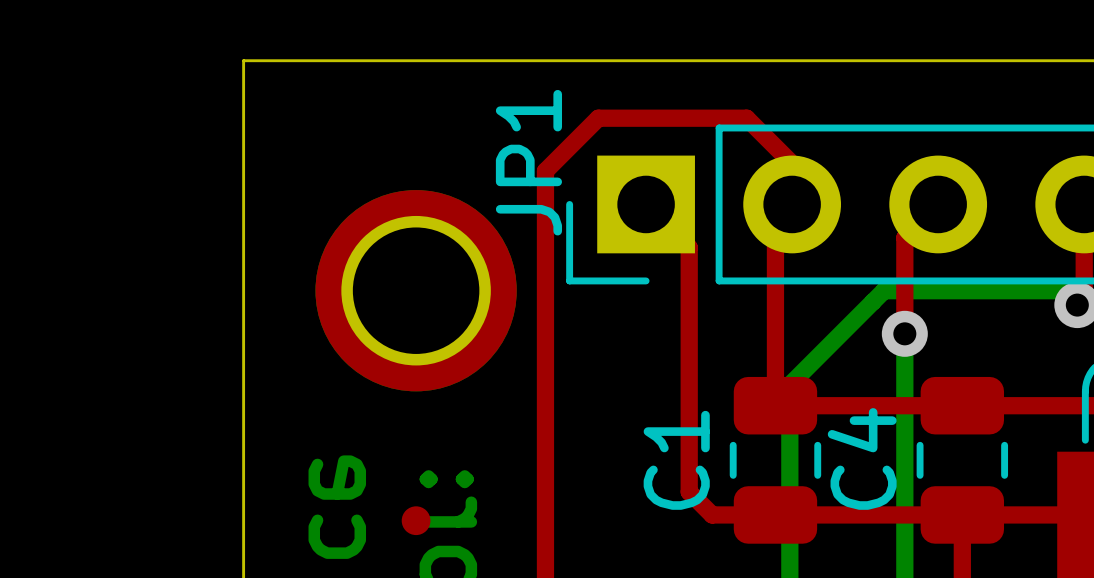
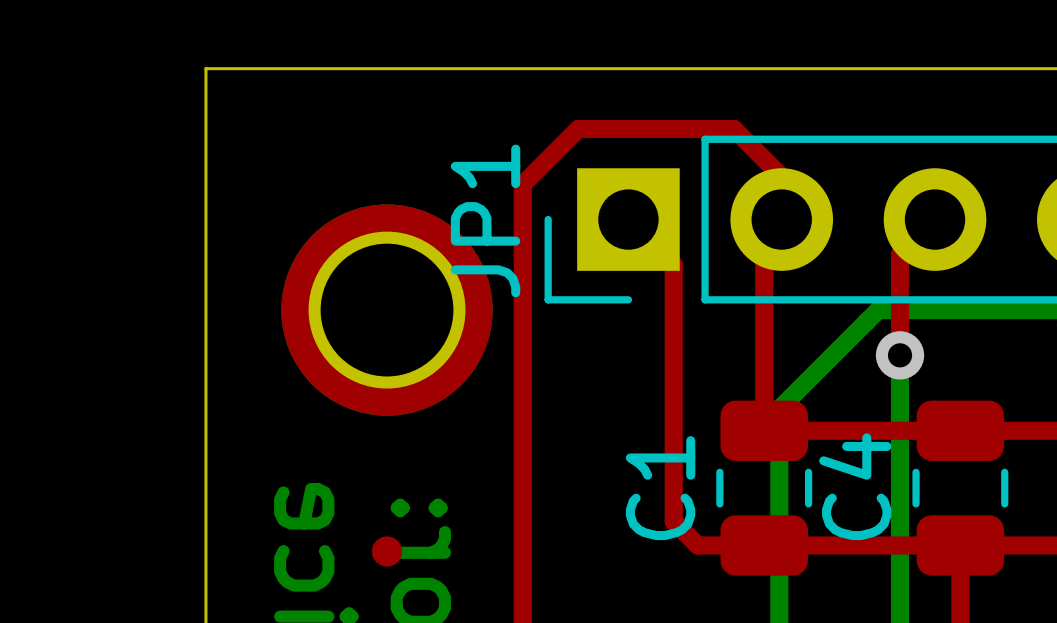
JP1 name position: JP1 (528, 162) -> JP1 (485, 220)

